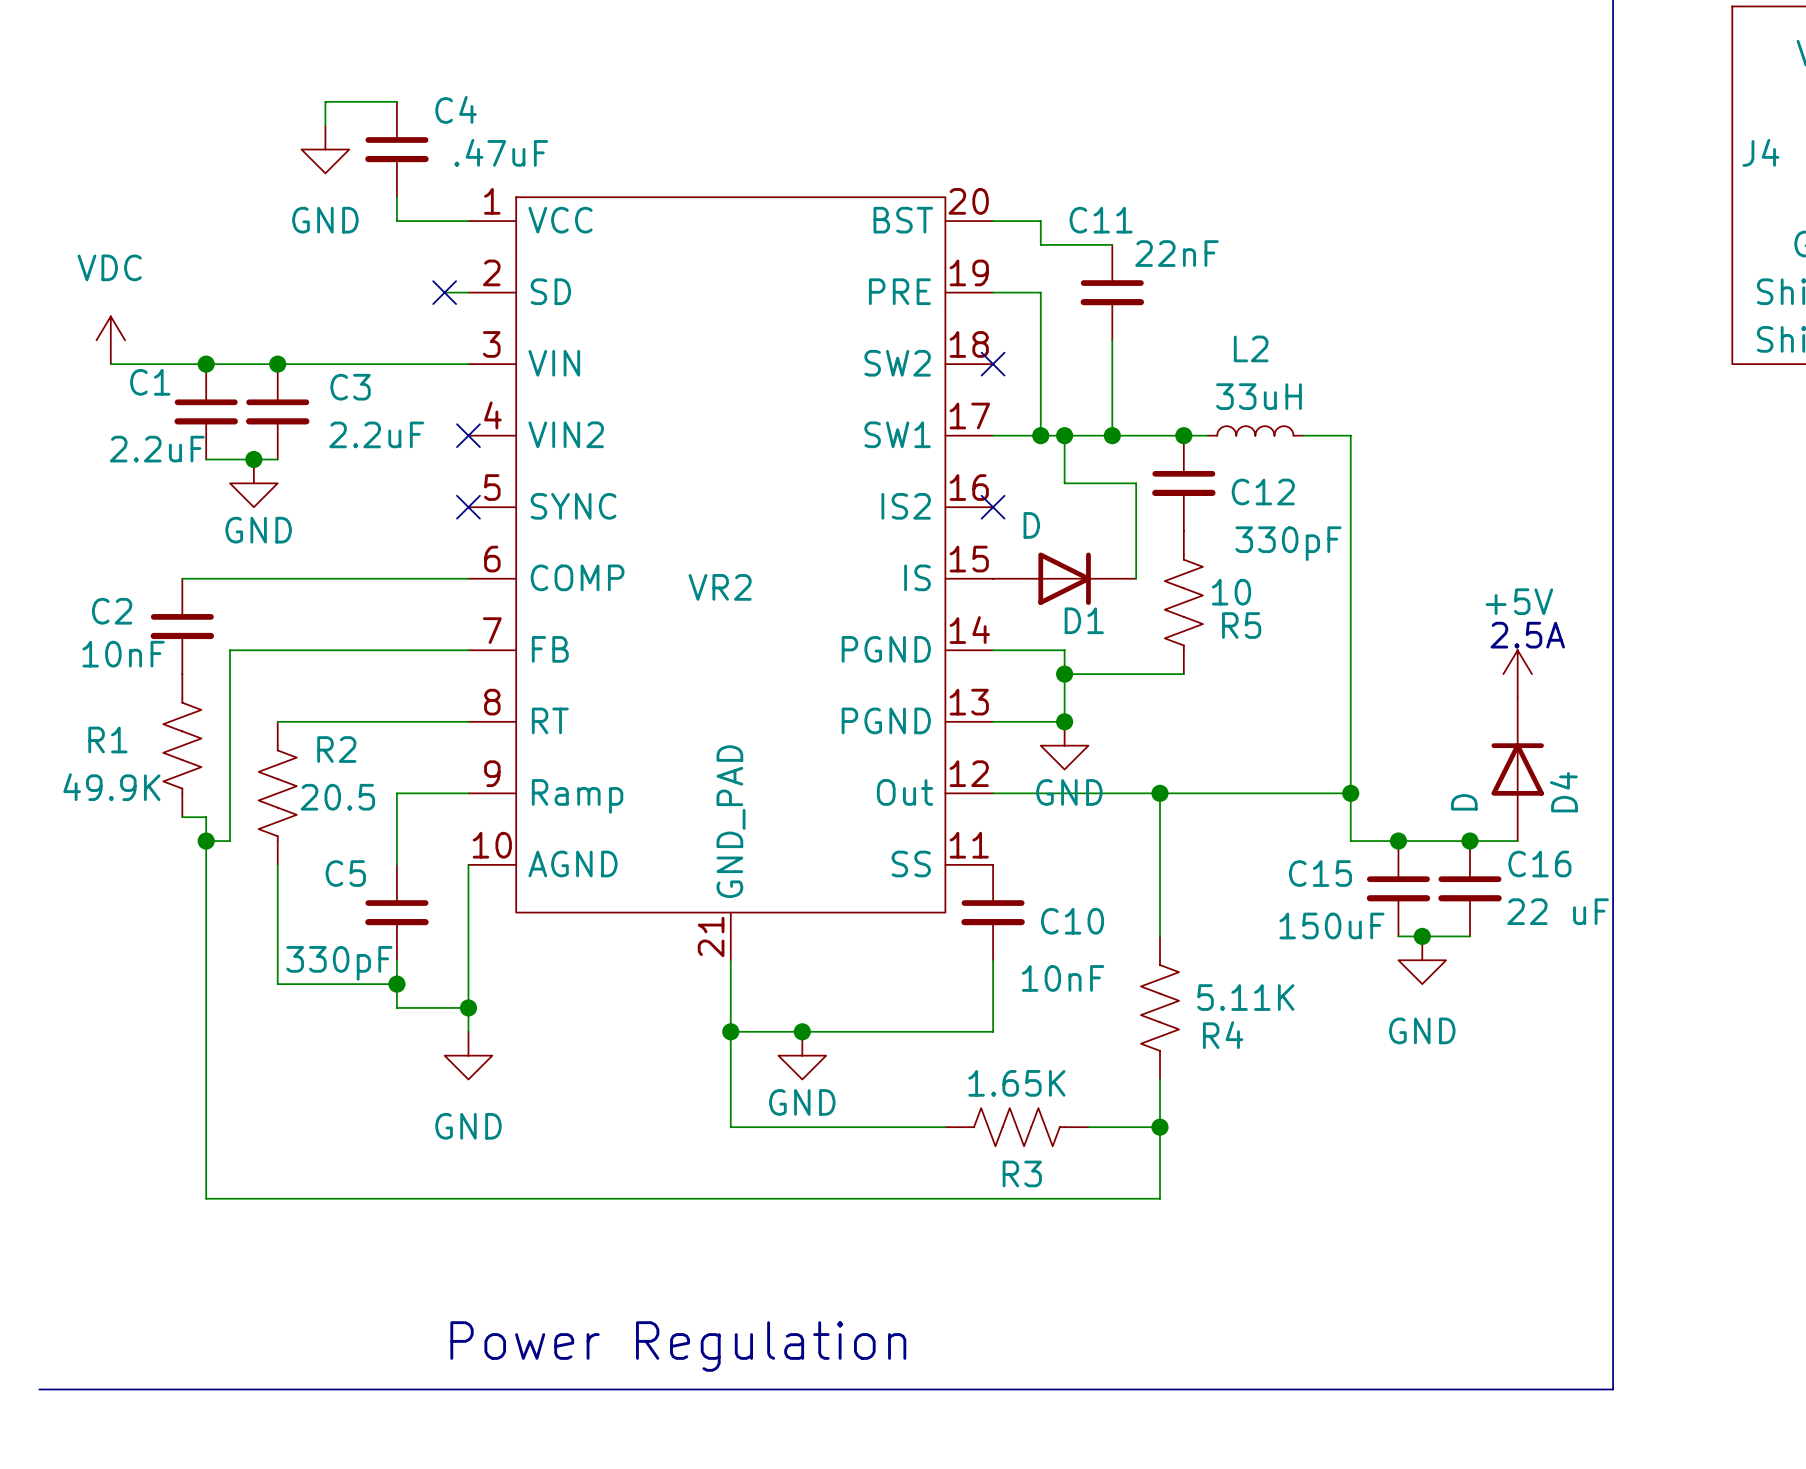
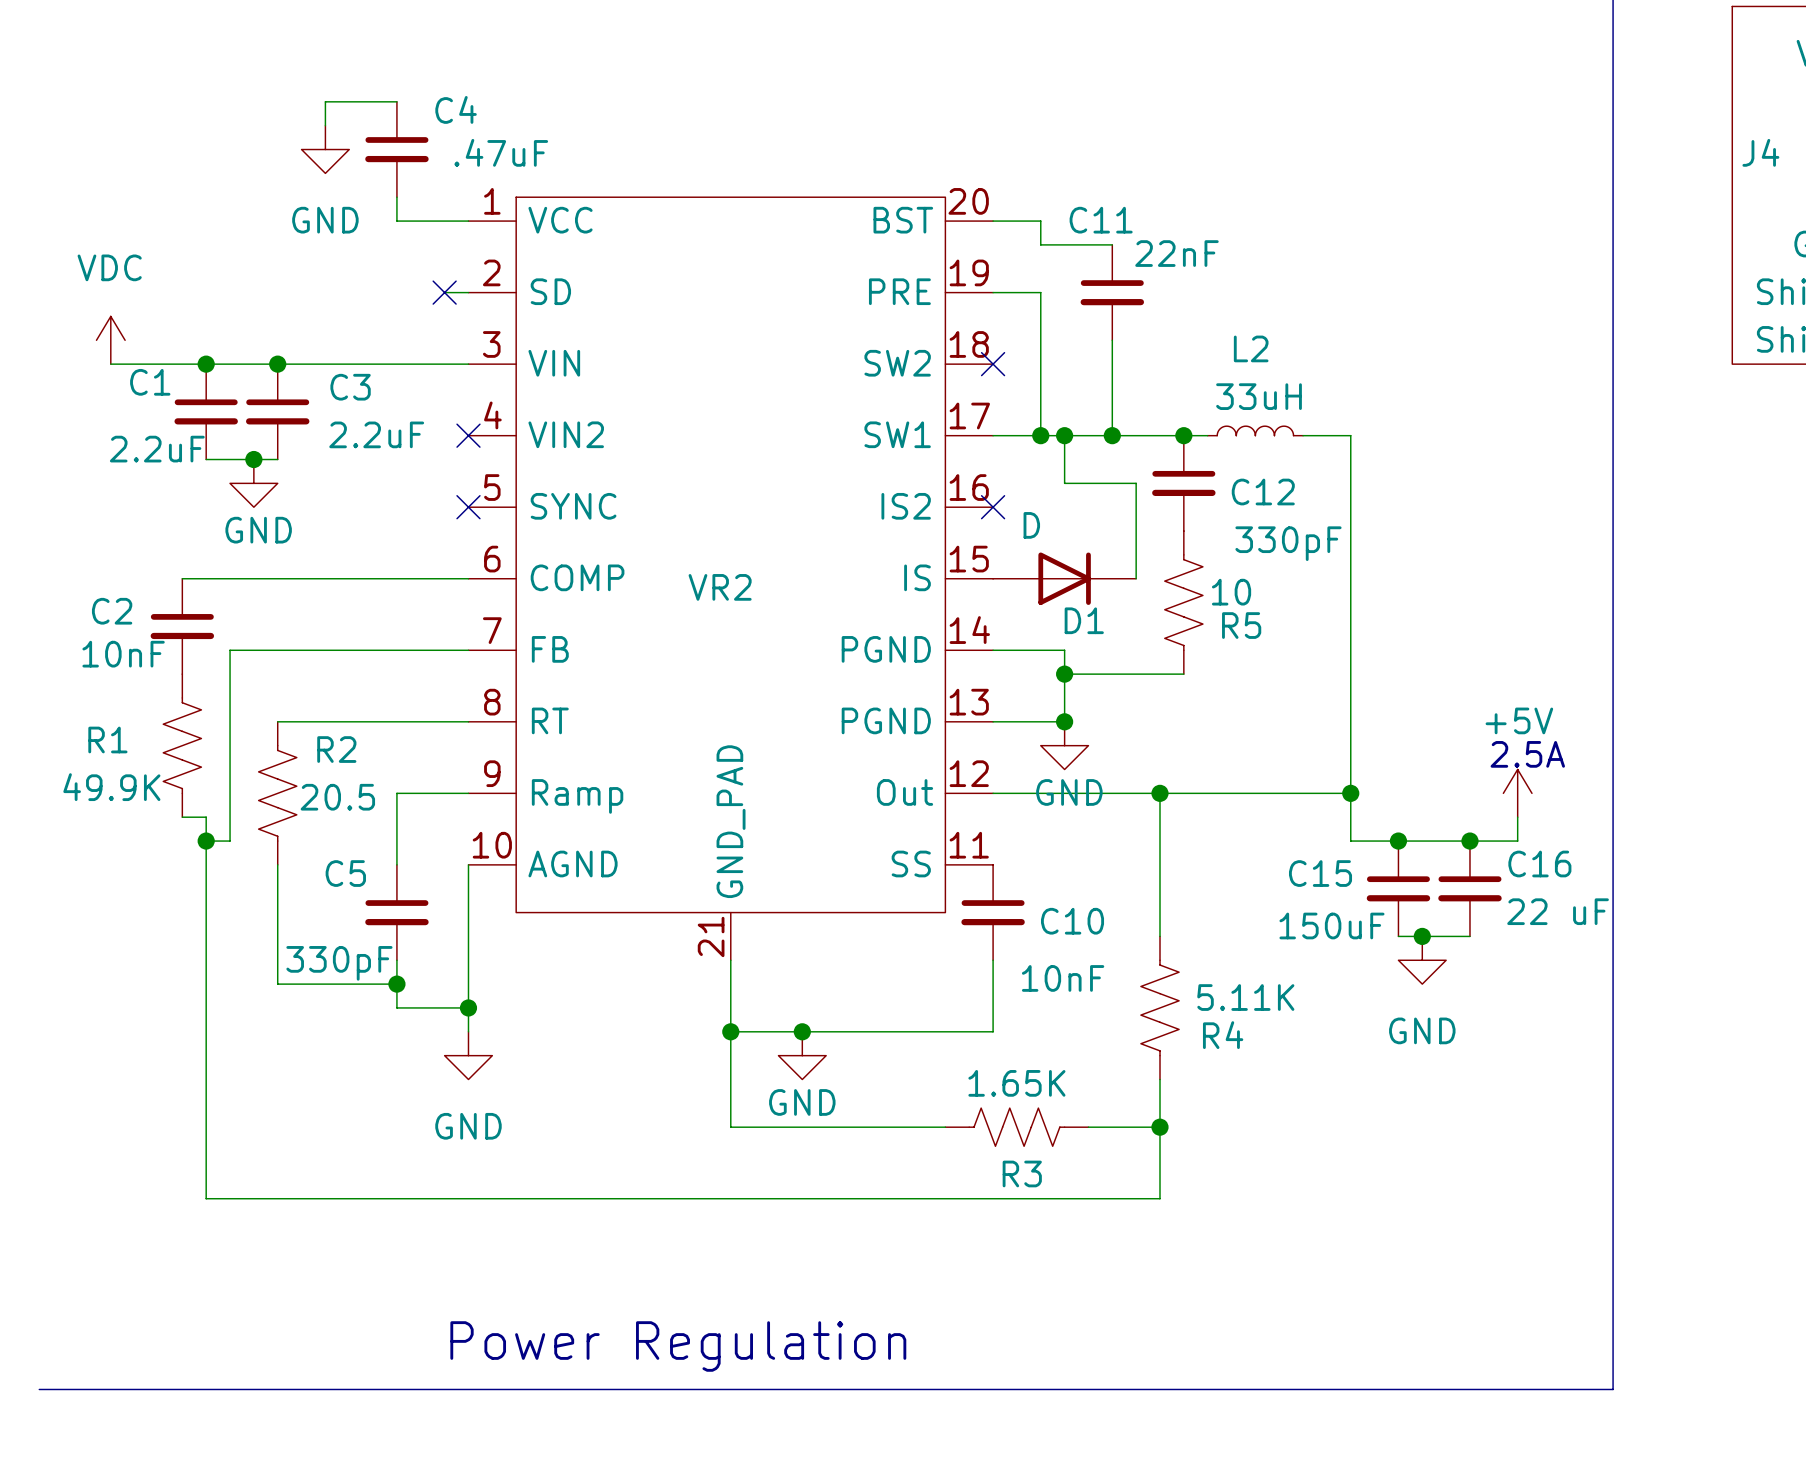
text position: 2.5A (1527, 635) -> 2.5A (1527, 754)
power symbol position: +5V (1517, 674) -> +5V (1517, 793)
D4: D (1517, 769) -> none

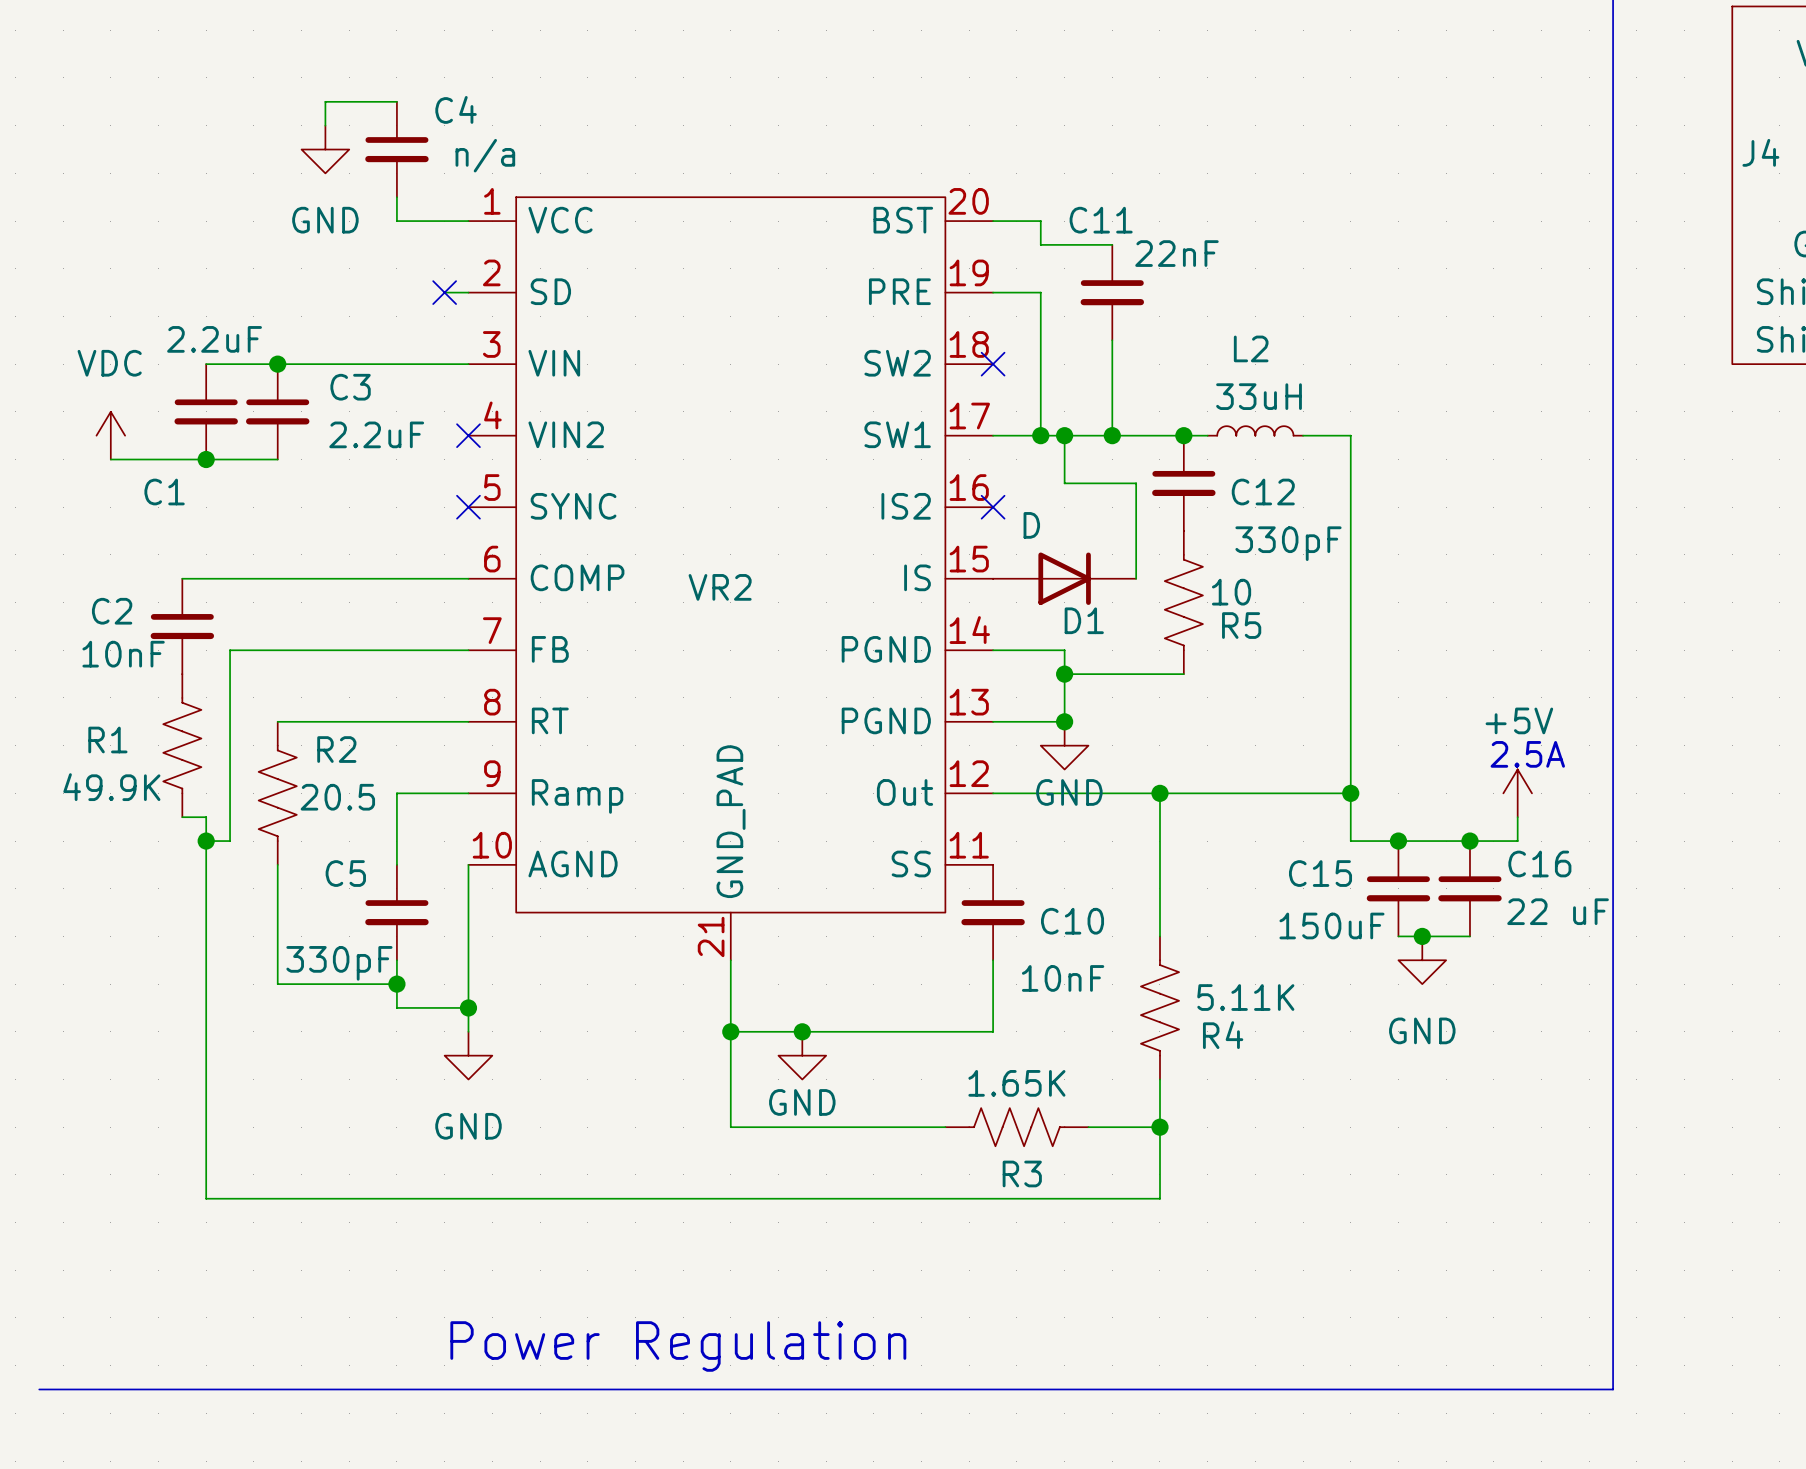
C4 value: .47uF (501, 152) -> n/a (485, 155)
power symbol position: VDC (110, 340) -> VDC (110, 435)
wire: (110, 364) (206, 364) -> (110, 459) (206, 459)
junction: (206, 364) -> none
C1 name position: C1 (150, 382) -> C1 (164, 492)
C1 value position: 2.2uF (157, 449) -> 2.2uF (214, 339)
junction: none -> (206, 459)
junction: (253, 459) -> none
power symbol: GND (253, 483) -> none

